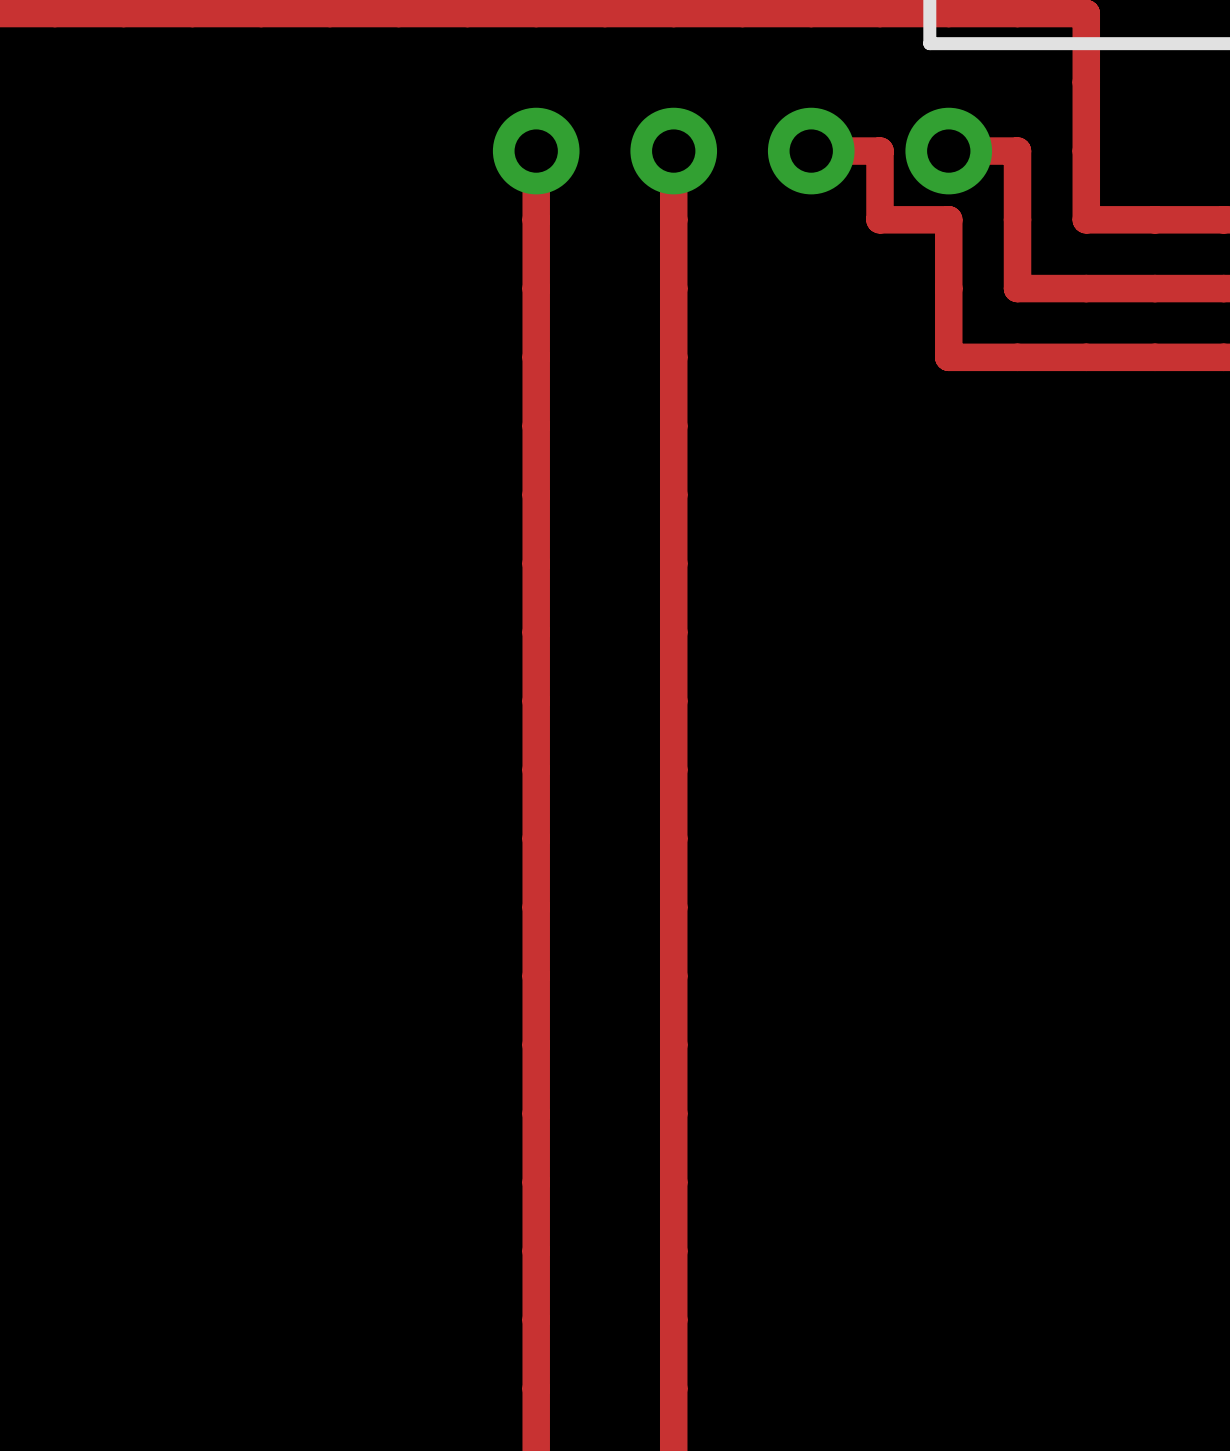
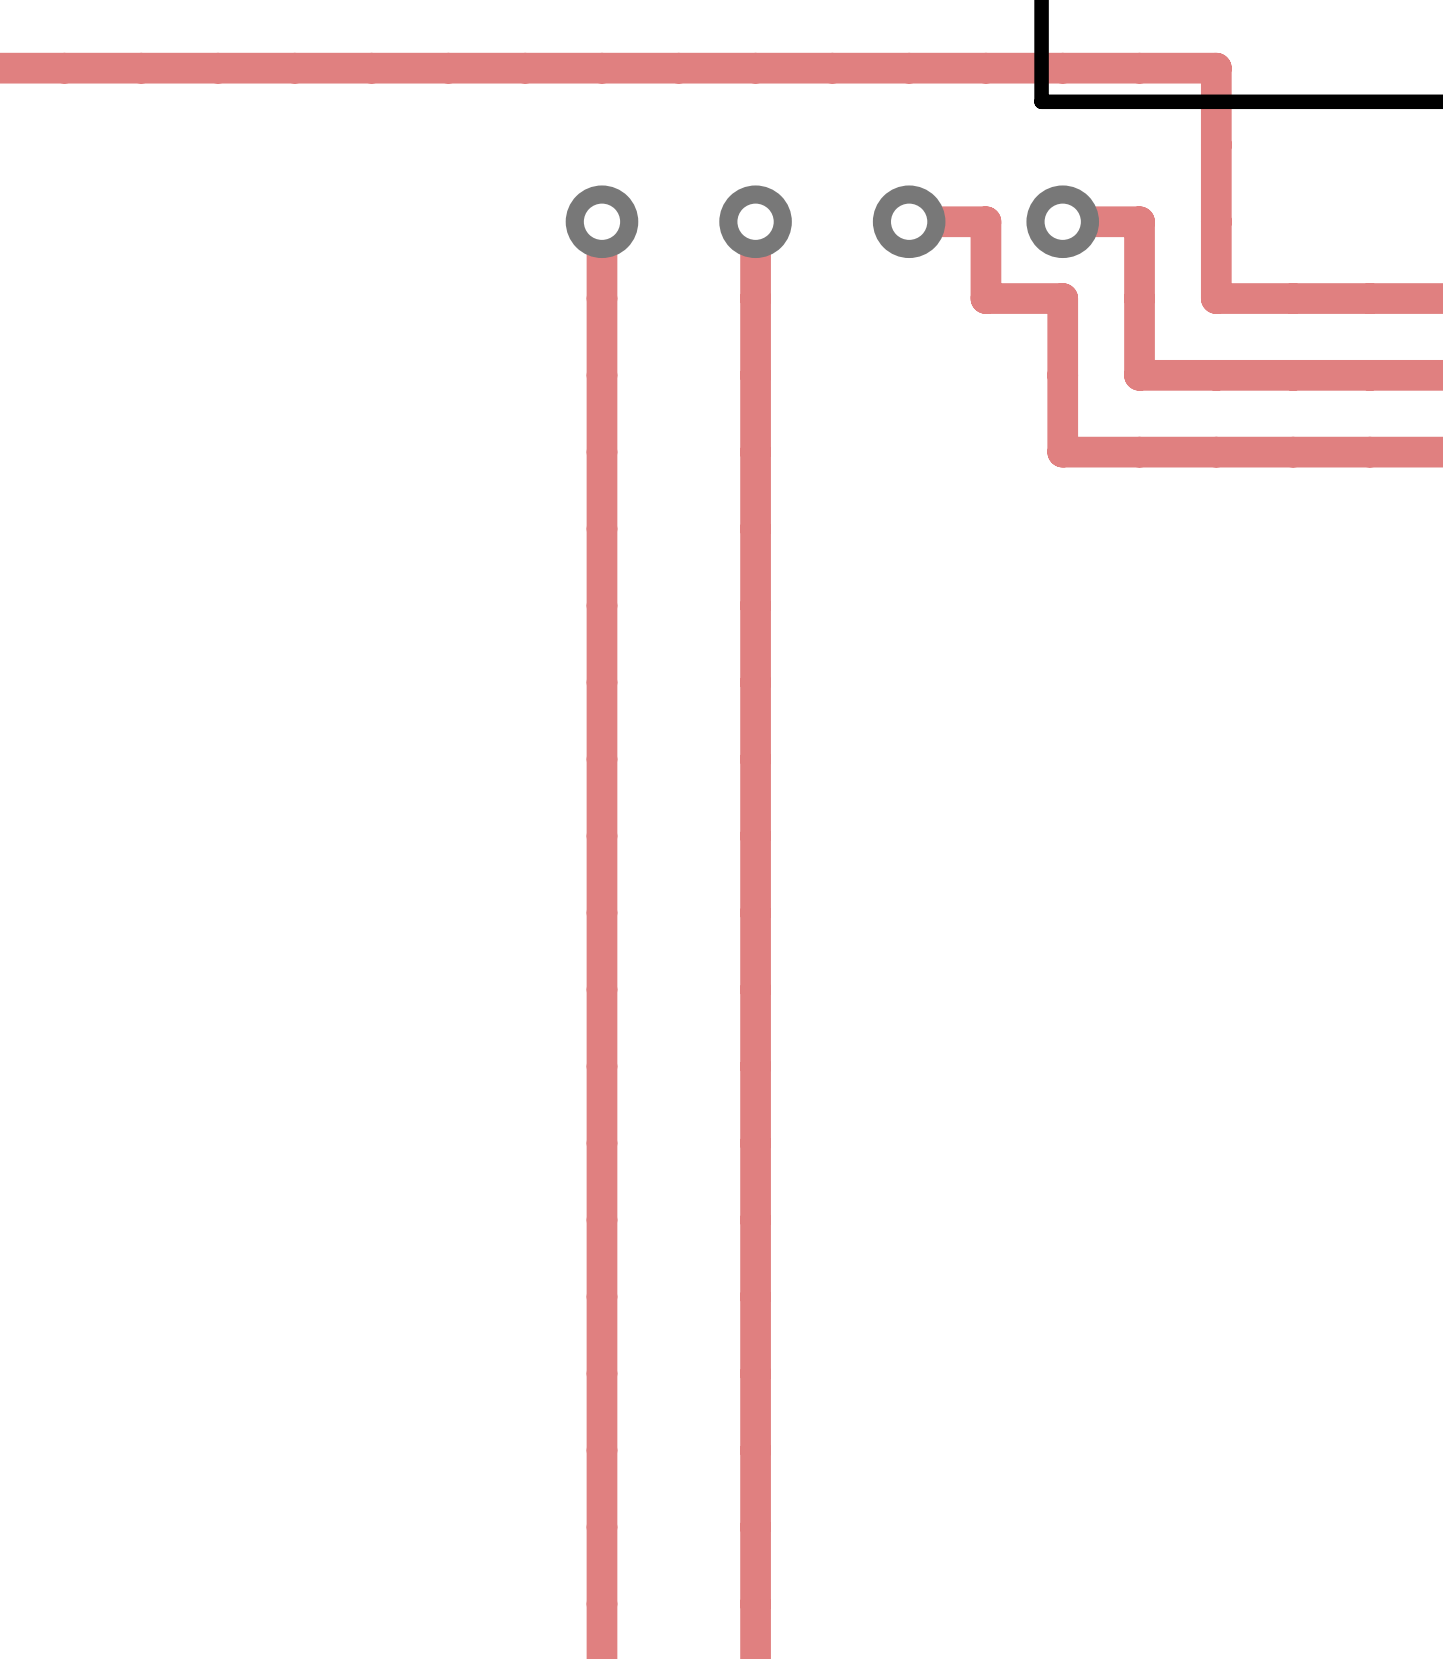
via size: [492, 107, 580, 195] -> [565, 185, 639, 259]
via size: [630, 107, 718, 195] -> [719, 185, 792, 259]
via size: [767, 107, 855, 195] -> [872, 185, 946, 259]
via size: [905, 107, 993, 195] -> [1026, 185, 1100, 259]

